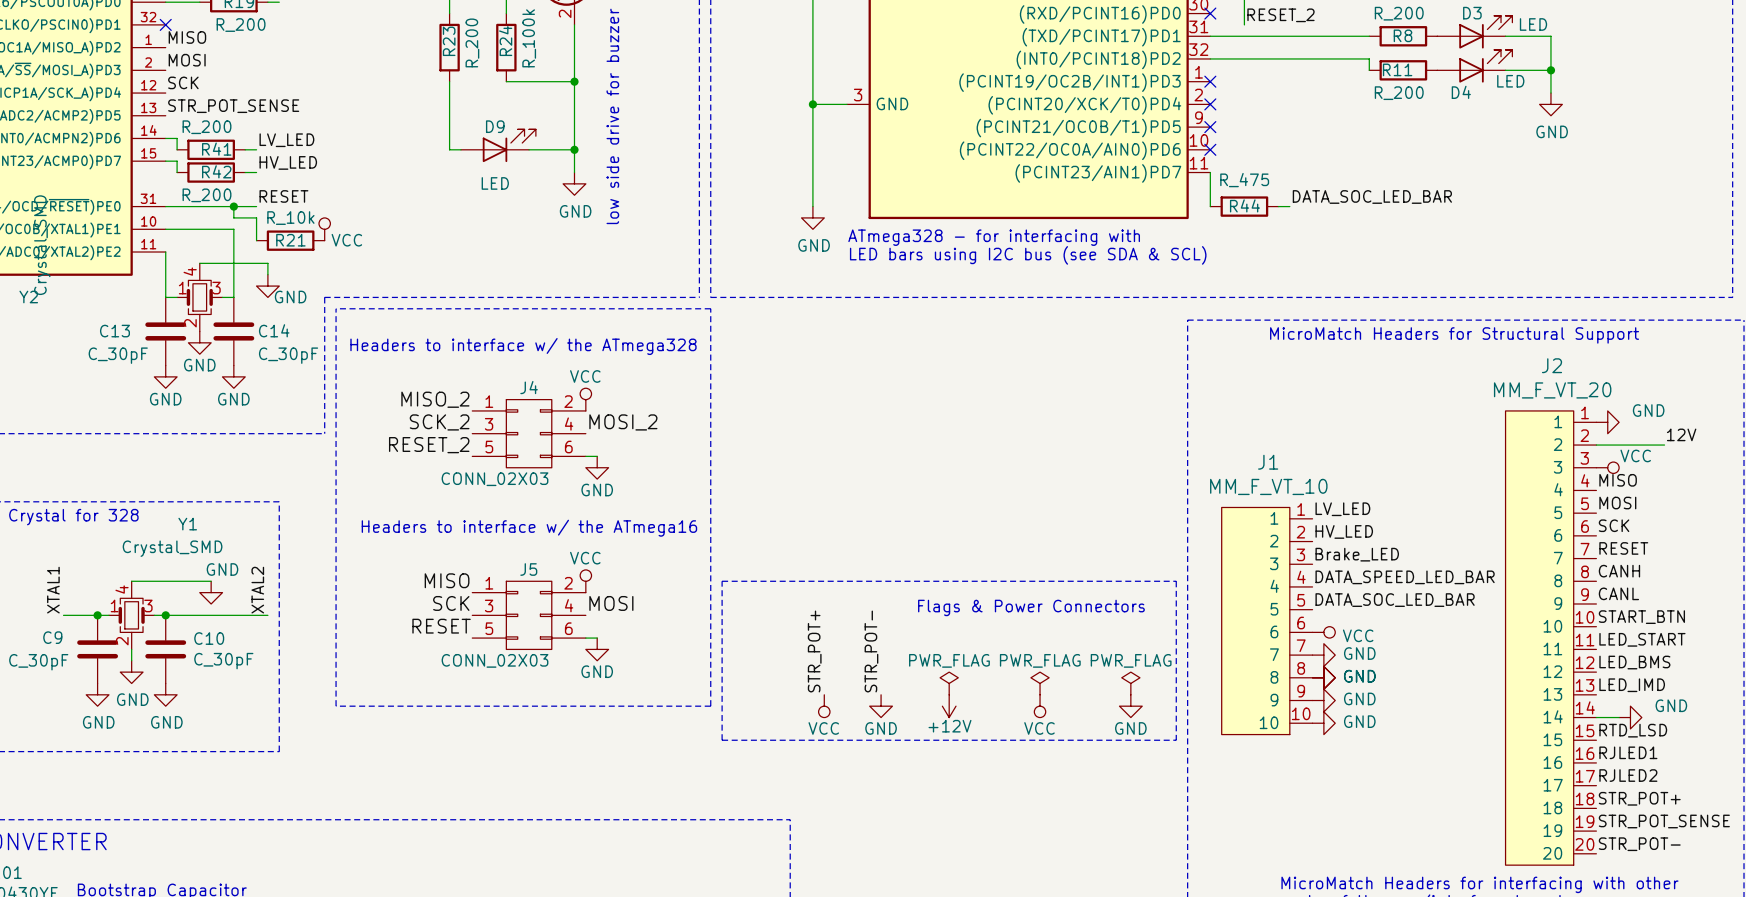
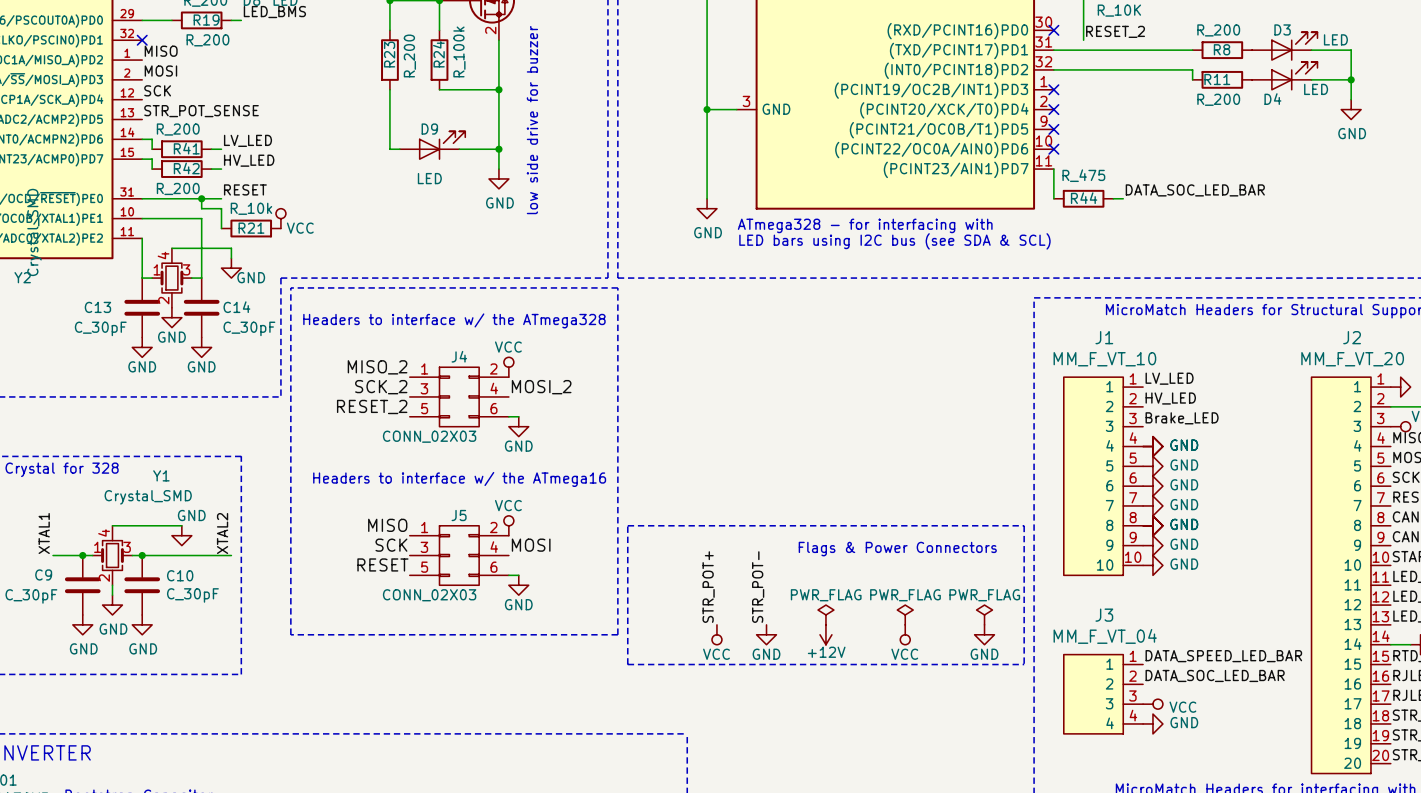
power symbol: none -> GND (1152, 446)
label position: LV_LED (1342, 509) -> LV_LED (1169, 378)
power symbol: none -> GND (1152, 466)
label position: HV_LED (1344, 531) -> HV_LED (1170, 398)
power symbol: none -> GND (1152, 486)
label position: Brake_LED (1357, 554) -> Brake_LED (1182, 418)
power symbol: none -> GND (1152, 505)
label position: DATA_SPEED_LED_BAR (1405, 577) -> DATA_SPEED_LED_BAR (1223, 656)
power symbol: none -> GND (1152, 525)
label position: DATA_SOC_LED_BAR (1395, 600) -> DATA_SOC_LED_BAR (1215, 675)
power symbol: none -> GND (1152, 545)
J1 position: (1267, 621) -> (1103, 476)
power symbol: VCC (1323, 632) -> GND (1152, 565)
power symbol: GND (1323, 655) -> none
power symbol: GND (1323, 677) -> none
power symbol: GND (1323, 700) -> none
power symbol: GND (1323, 723) -> none
J3: none -> MM_F_VT_04 (1103, 694)
power symbol: none -> VCC (1152, 704)
power symbol: none -> GND (1152, 723)

